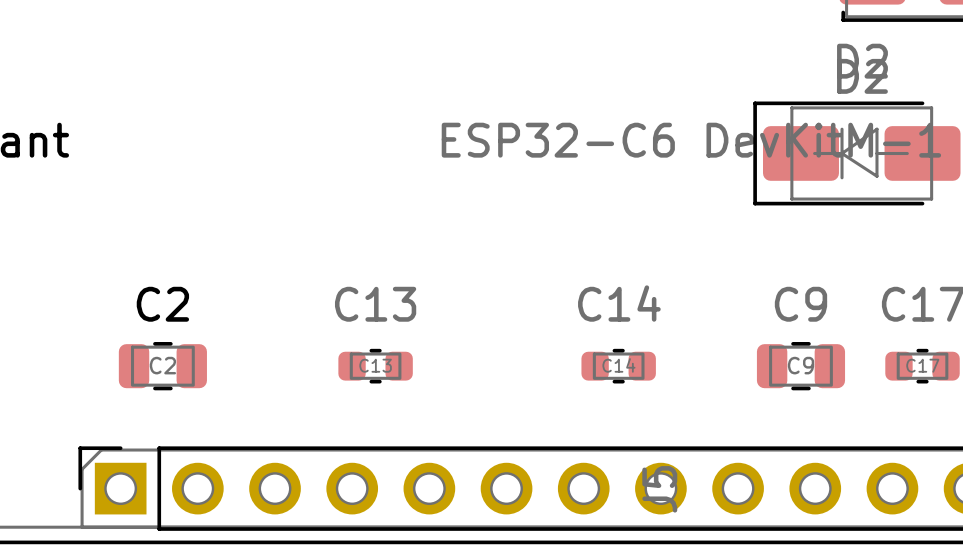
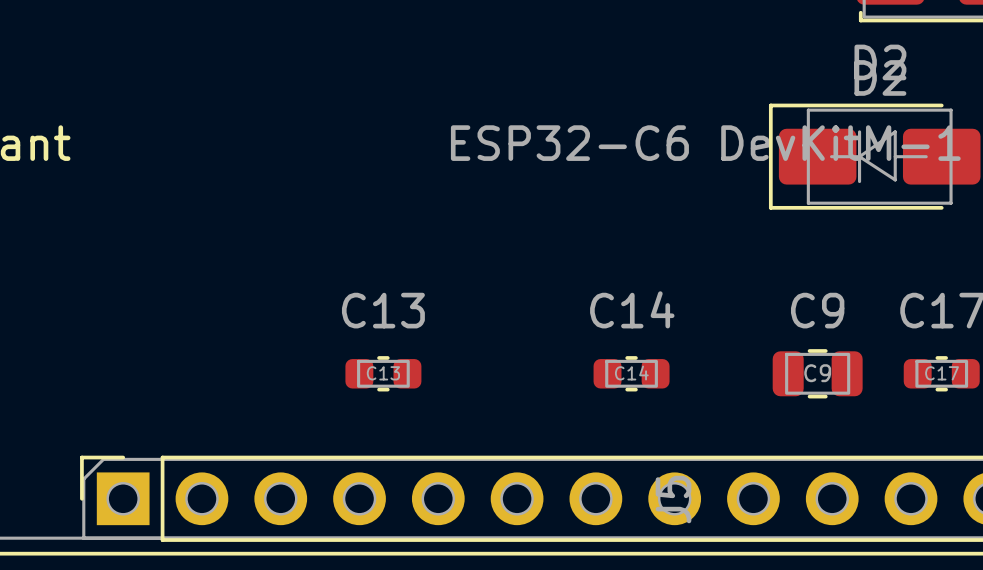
text: C2 (162, 304) -> none
part: (162, 366) -> none

